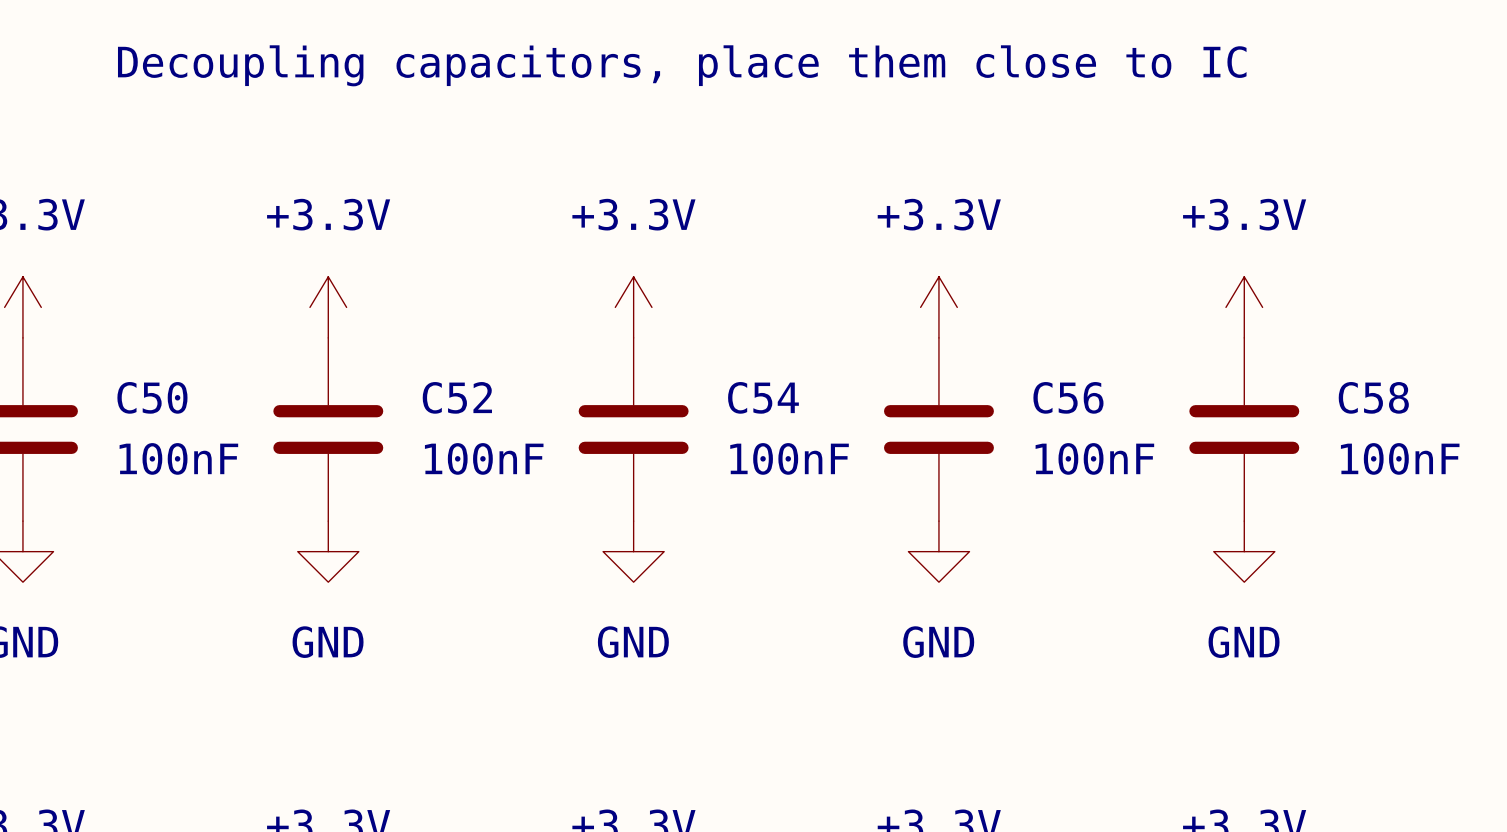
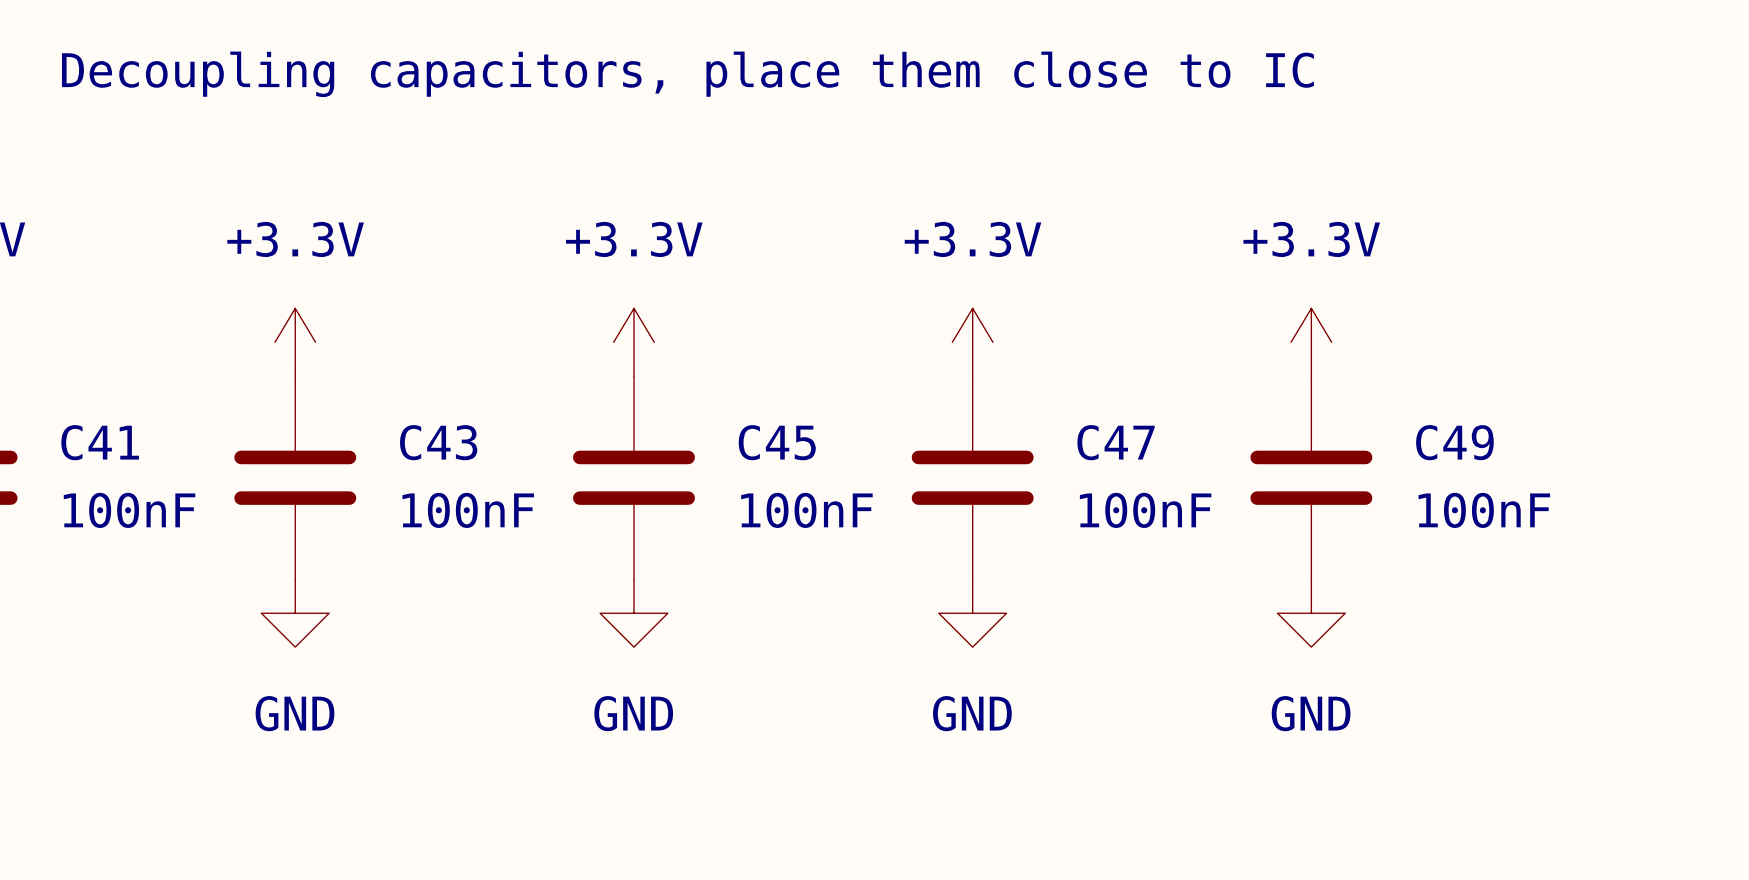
C50 name: C50 (152, 397) -> C41 (100, 442)
C52 name: C52 (457, 397) -> C43 (438, 442)
C54 name: C54 (763, 397) -> C45 (777, 442)
C56 name: C56 (1068, 397) -> C47 (1116, 442)
C58 name: C58 (1373, 397) -> C49 (1454, 442)

